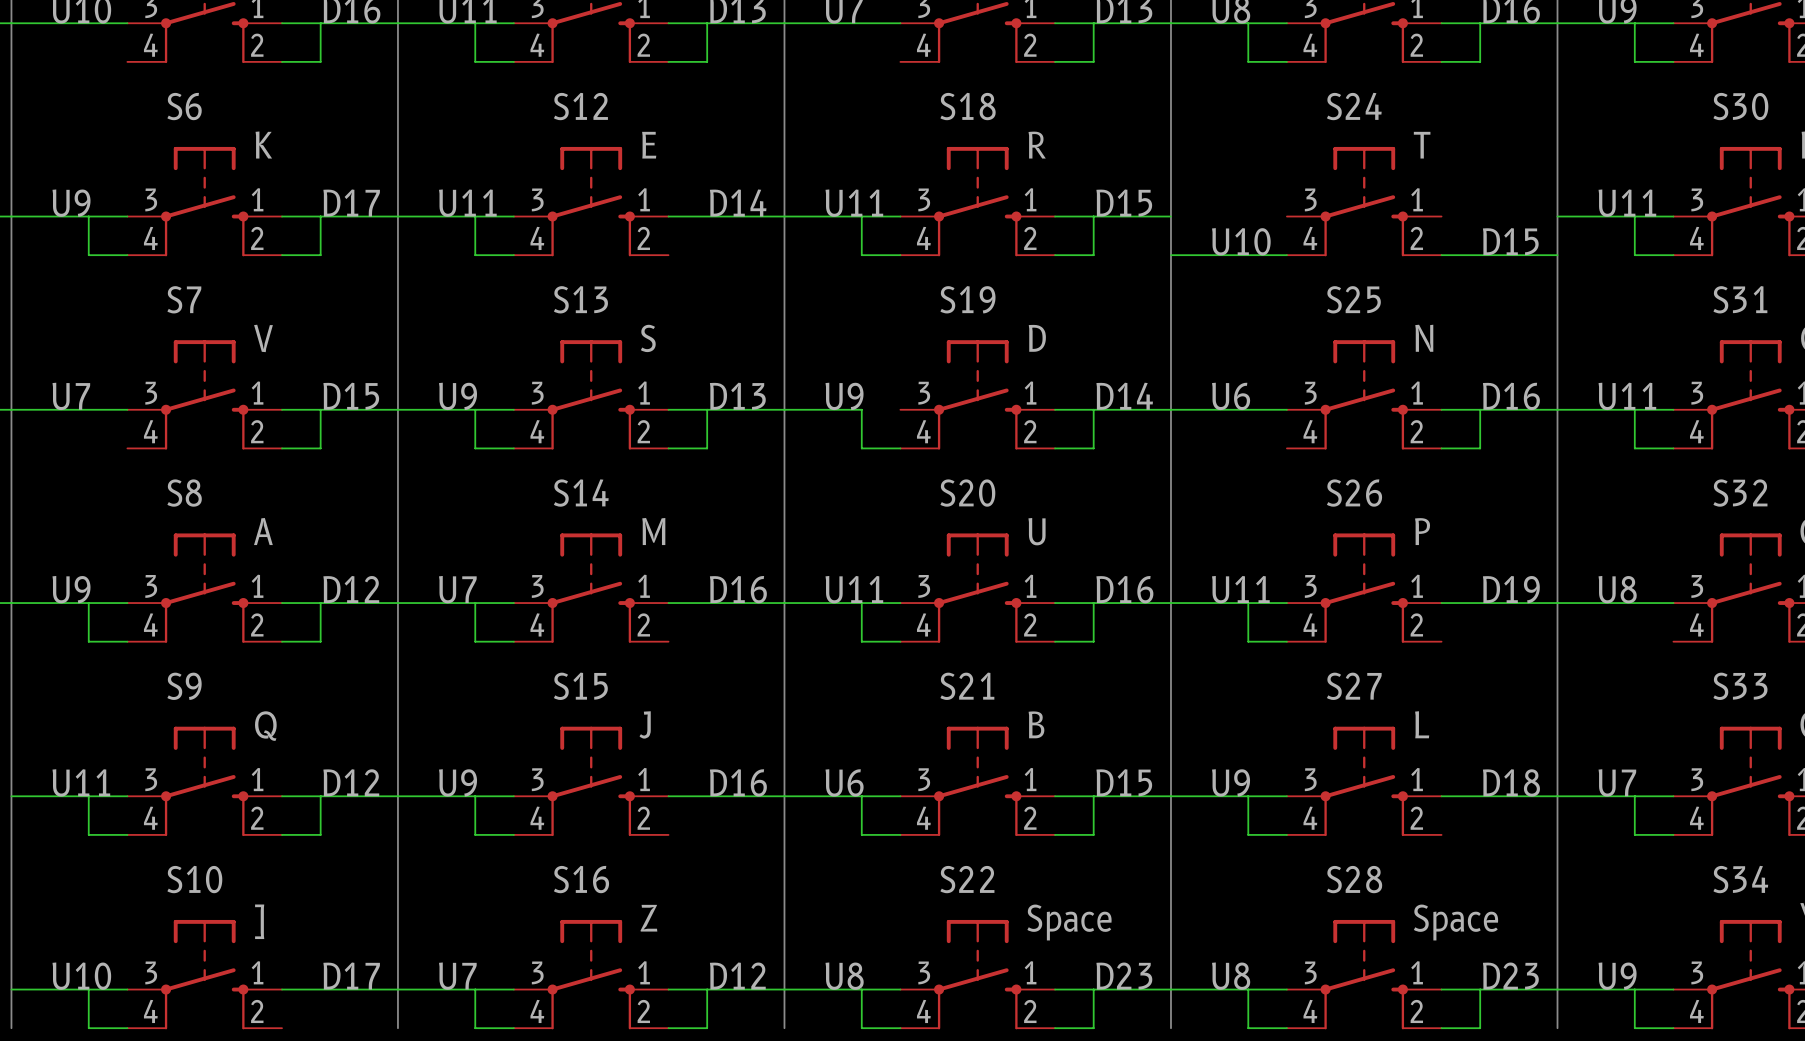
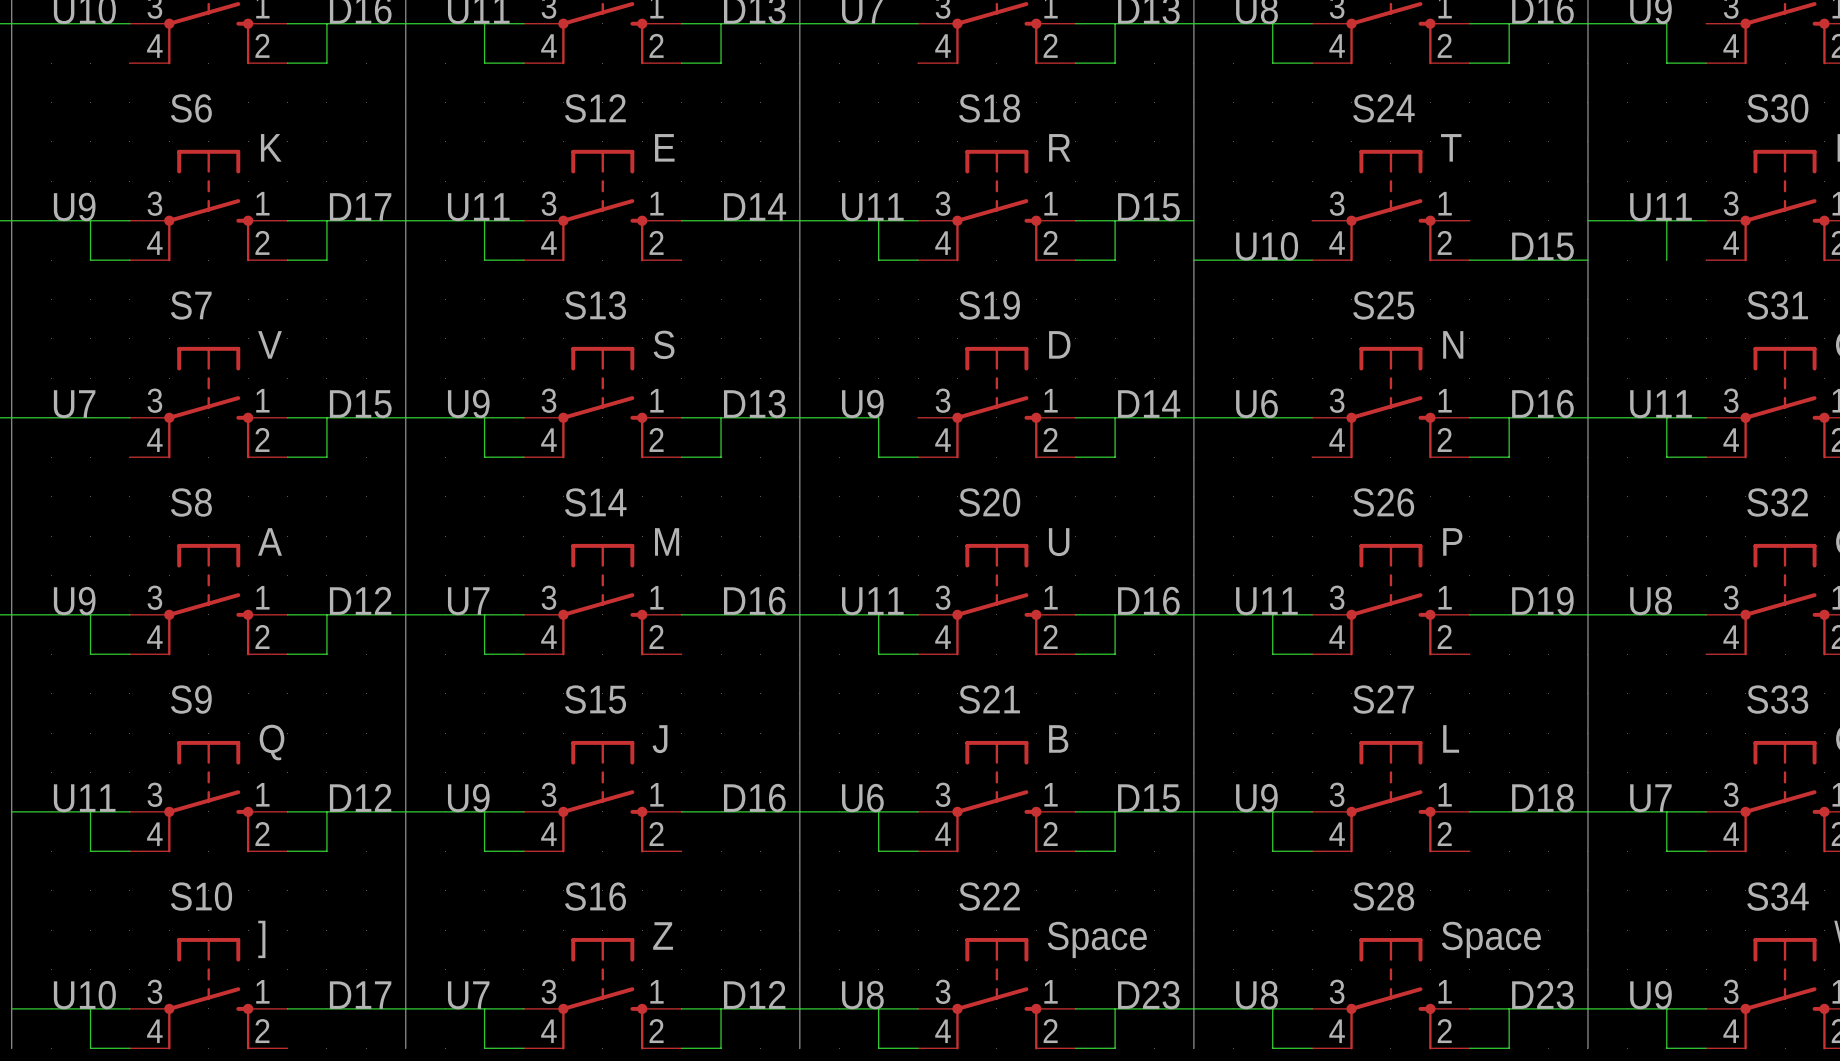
wire: (1634, 23) (1673, 23) -> none
wire: (1634, 255) (1673, 255) -> none

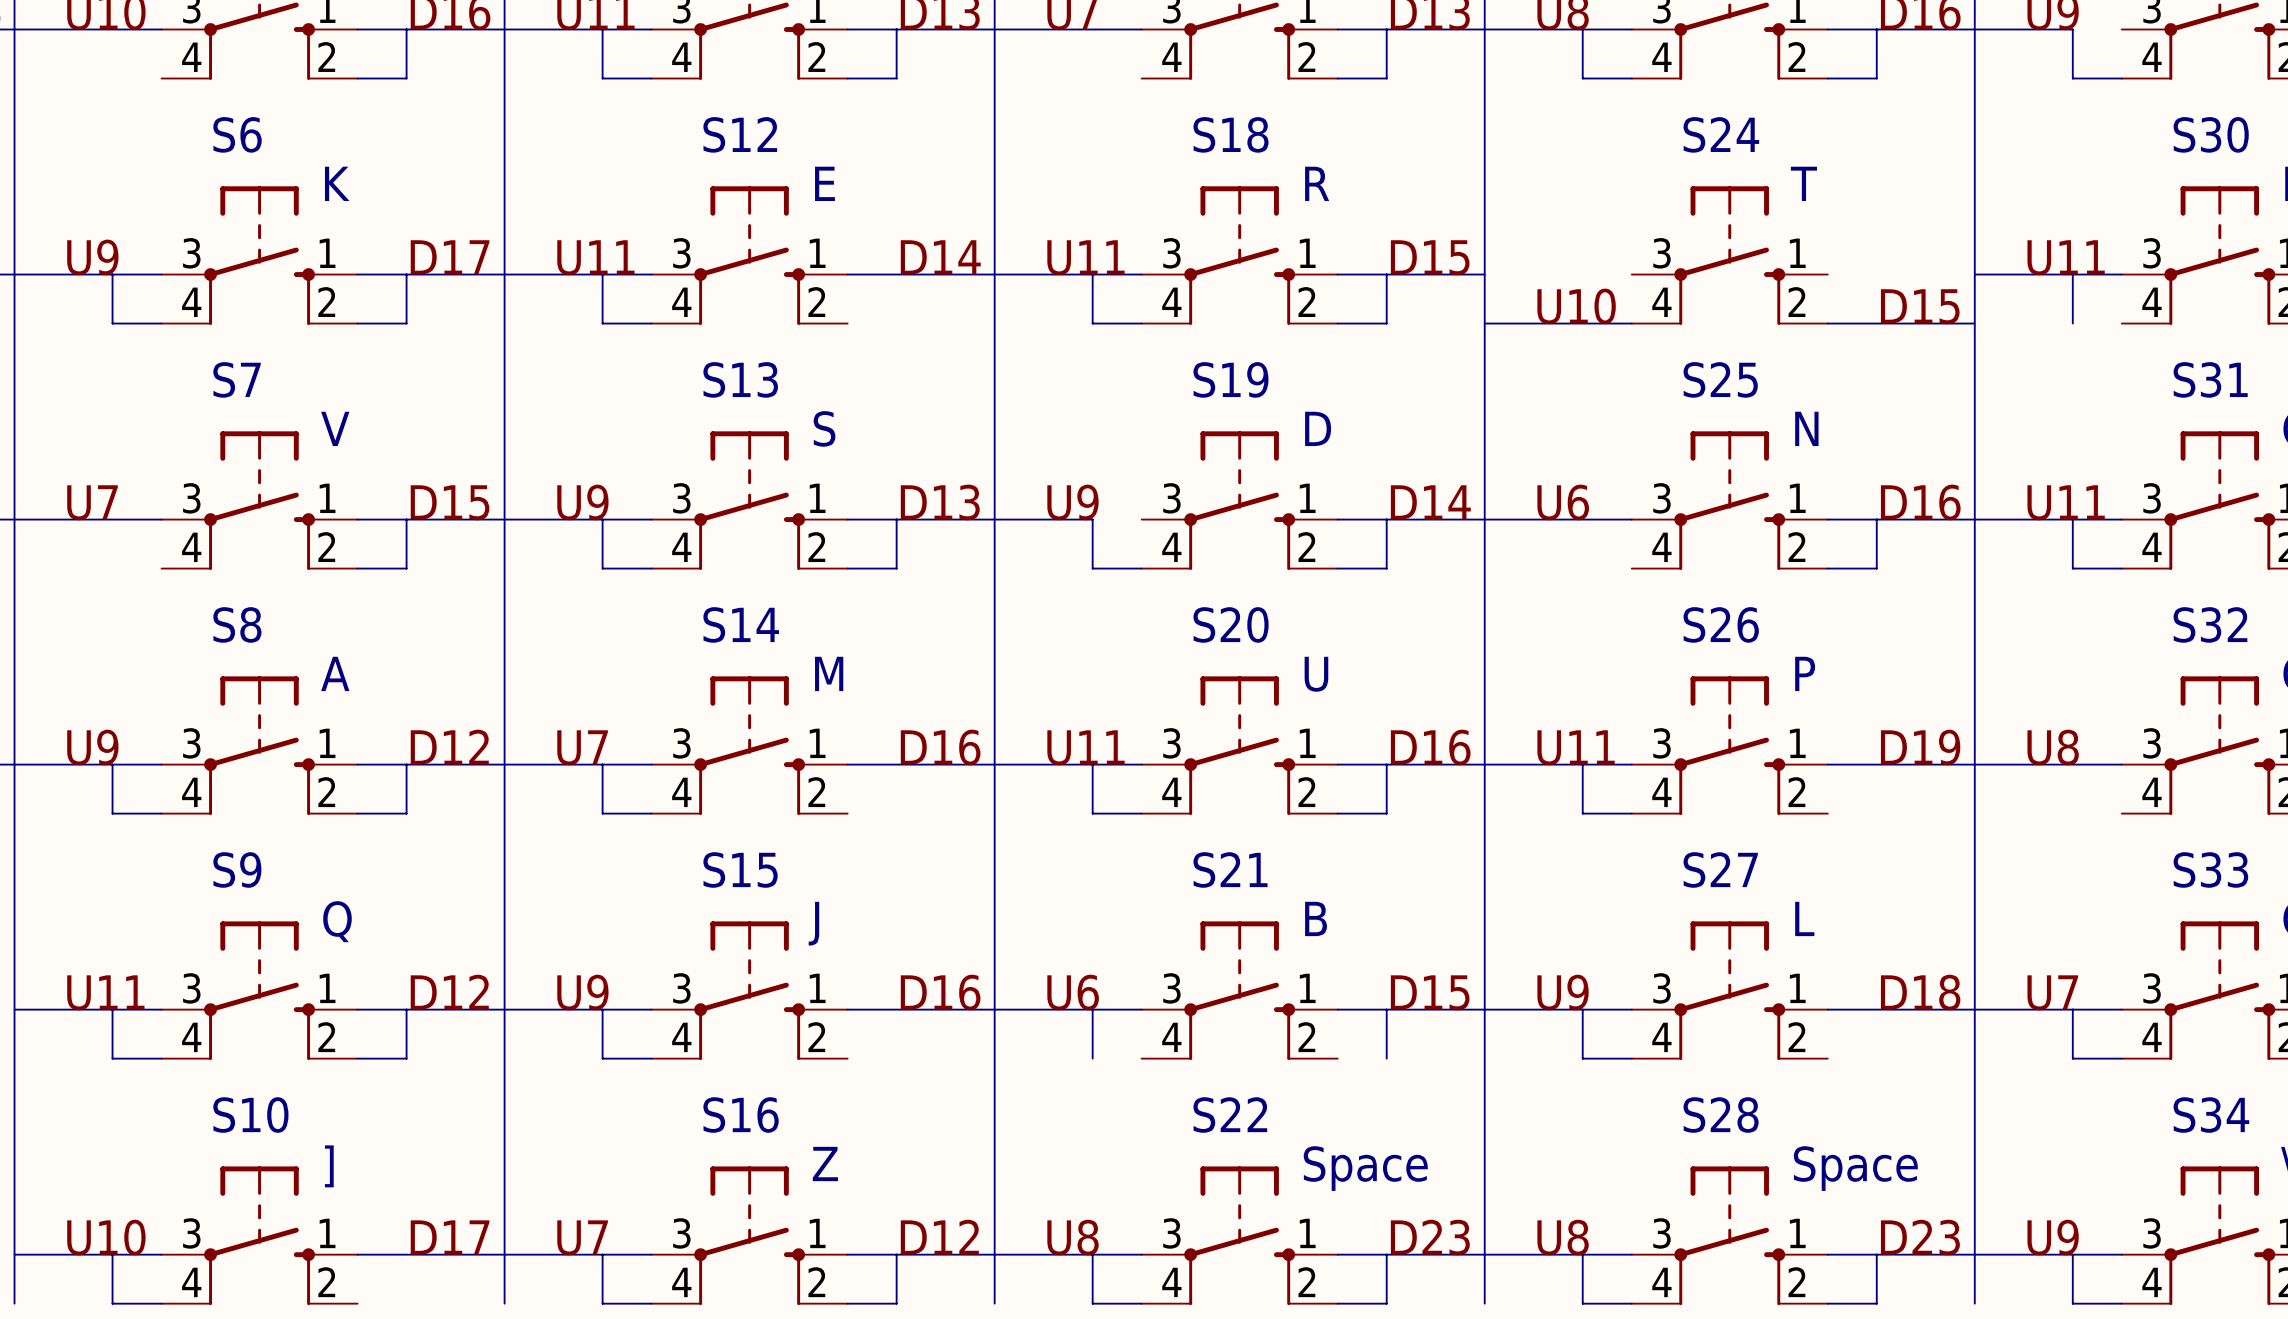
wire: (878, 851) (918, 851) -> none
wire: (1075, 851) (1115, 851) -> none

